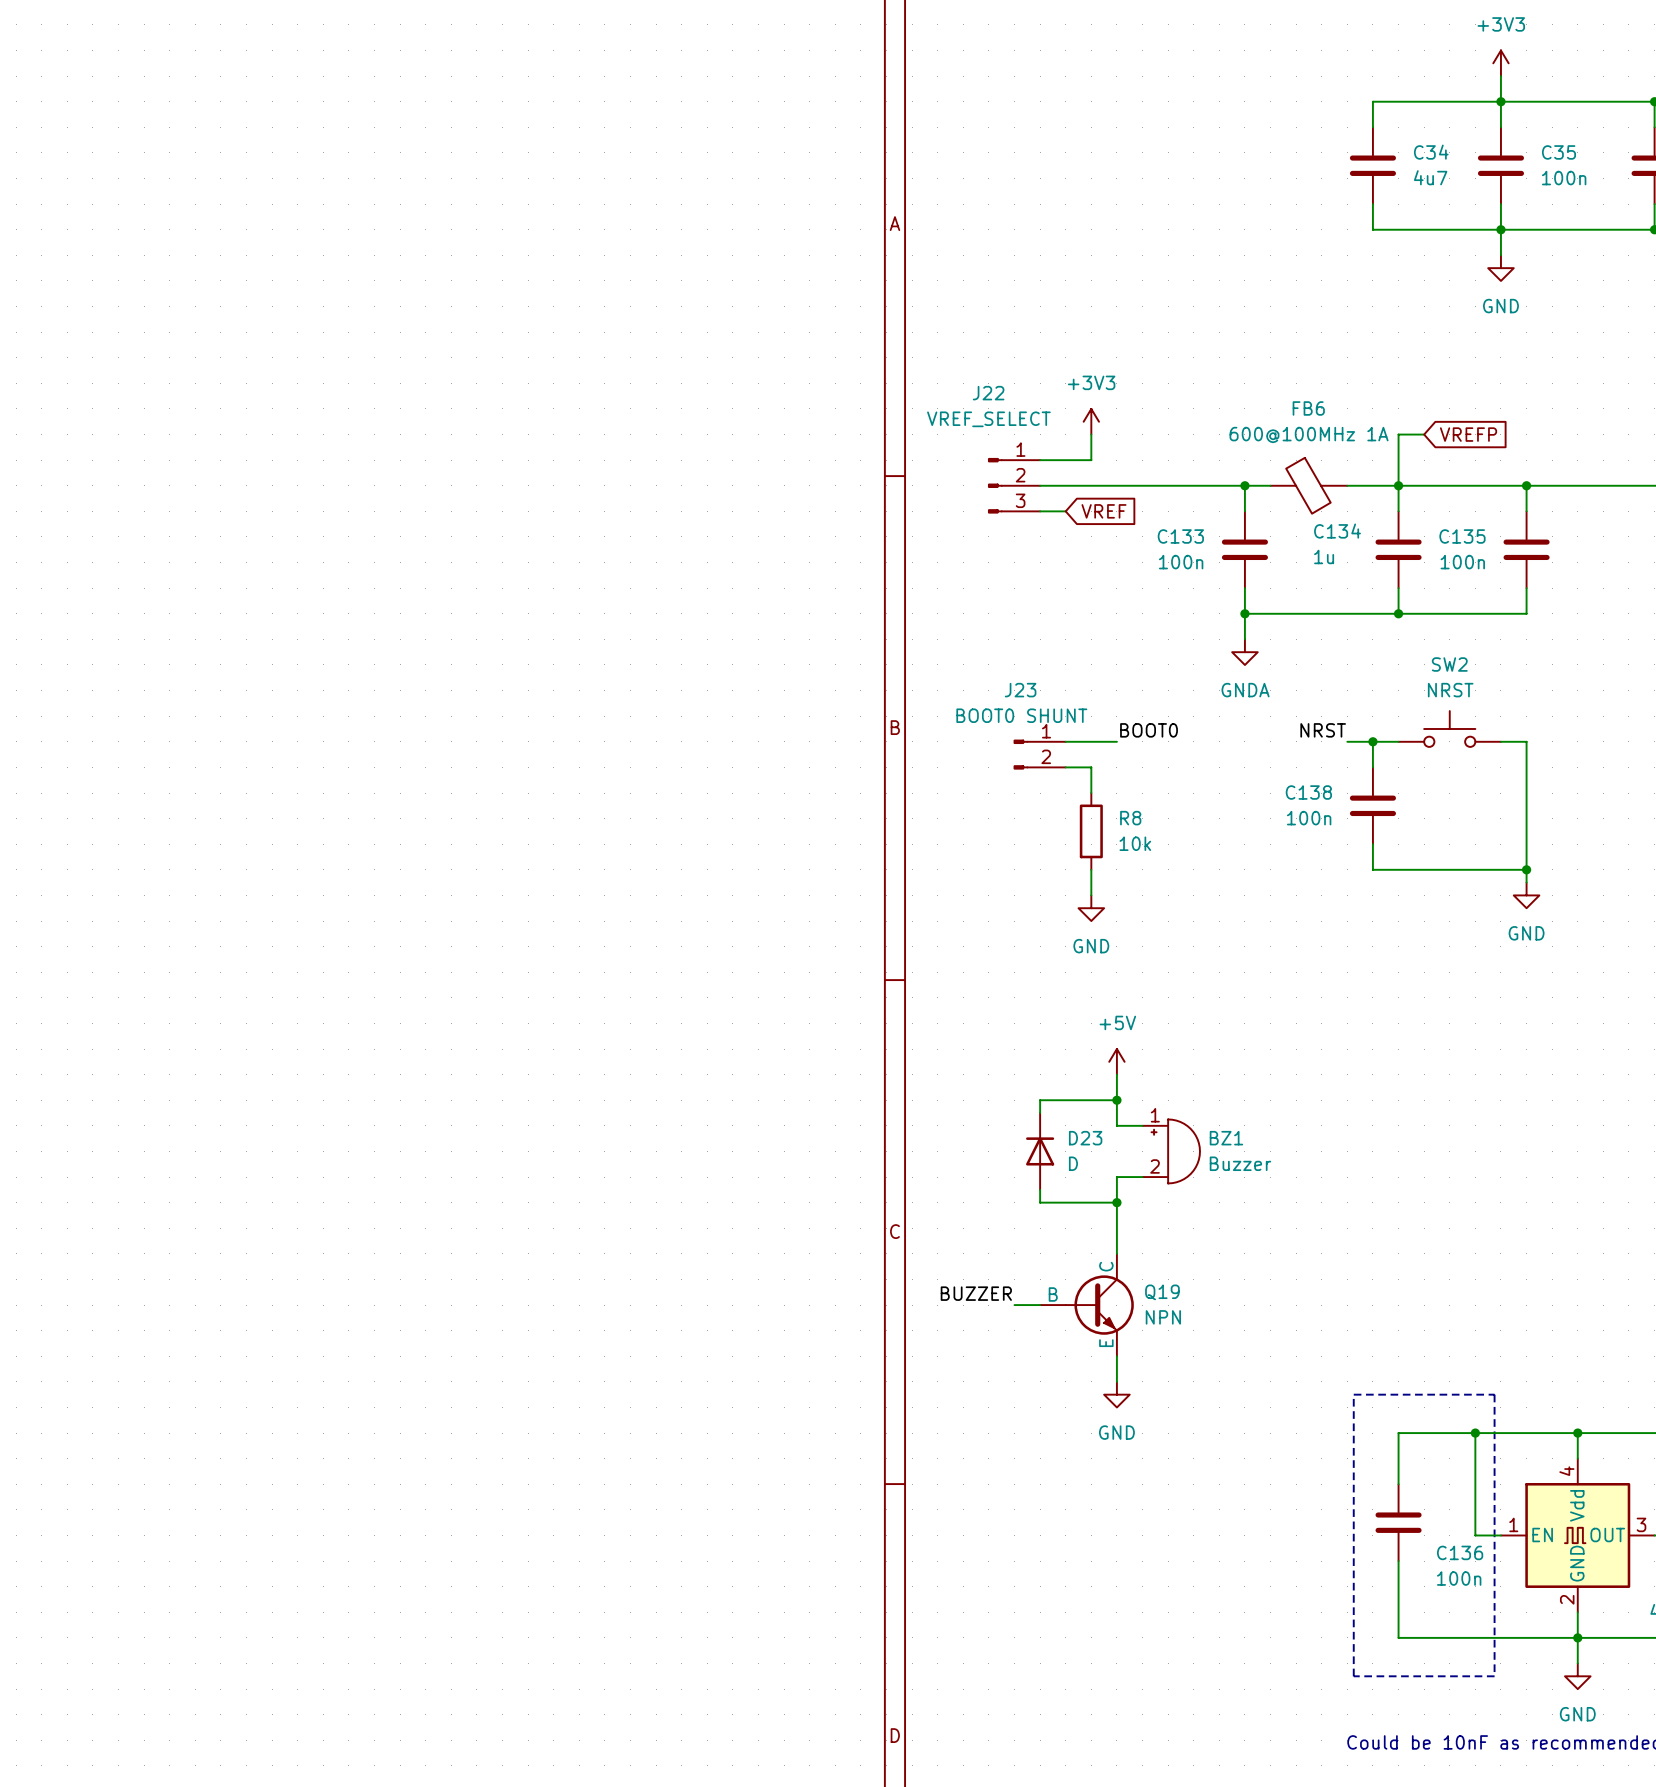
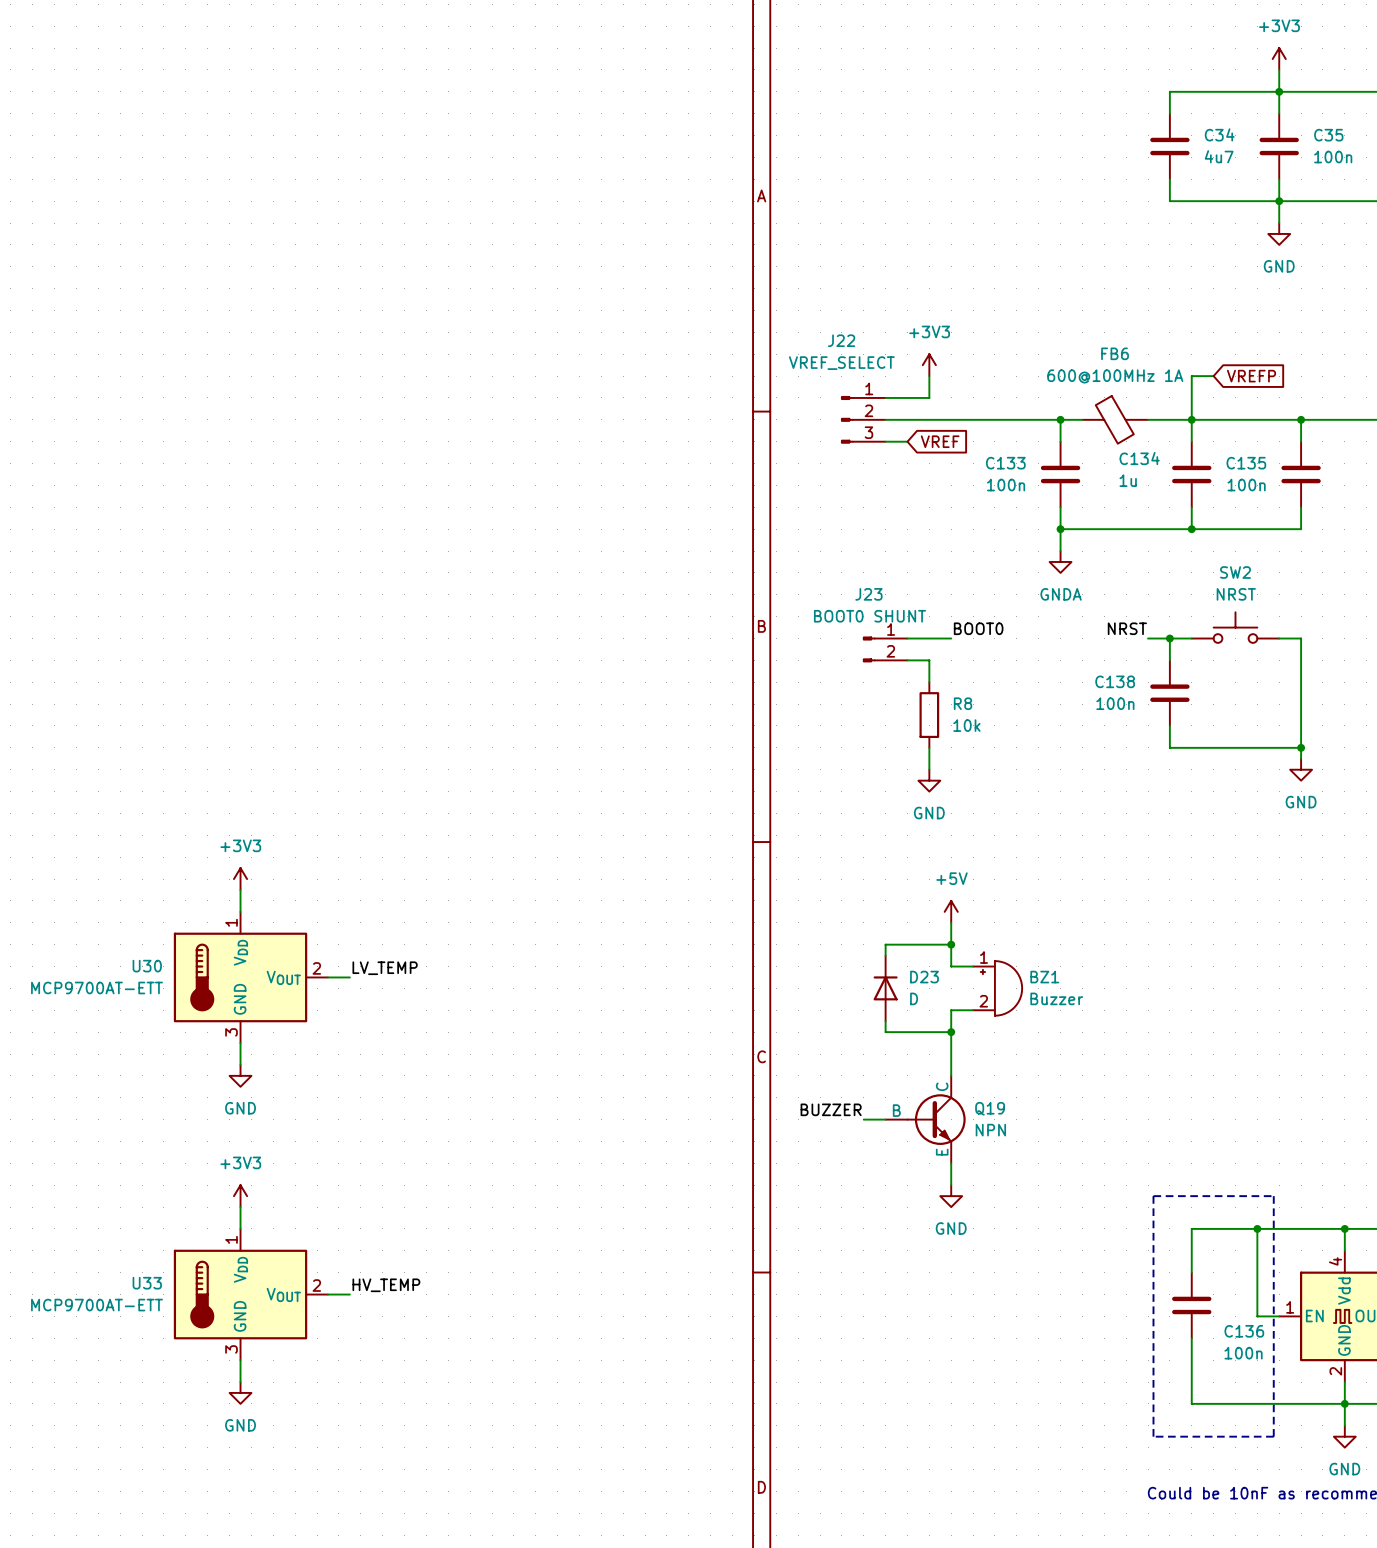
power symbol: none -> +3V3 (240, 879)
wire: none -> (240, 889) (240, 911)
label: none -> LV_TEMP (385, 968)
U30: none -> MCP9700AT-ETT (250, 977)
wire: none -> (327, 977) (349, 977)
wire: none -> (240, 1043) (240, 1064)
power symbol: none -> GND (240, 1075)
power symbol: none -> +3V3 (240, 1196)
wire: none -> (240, 1207) (240, 1228)
label: none -> HV_TEMP (386, 1285)
U33: none -> MCP9700AT-ETT (250, 1294)
wire: none -> (327, 1294) (349, 1294)
wire: none -> (240, 1360) (240, 1382)
power symbol: none -> GND (240, 1392)

